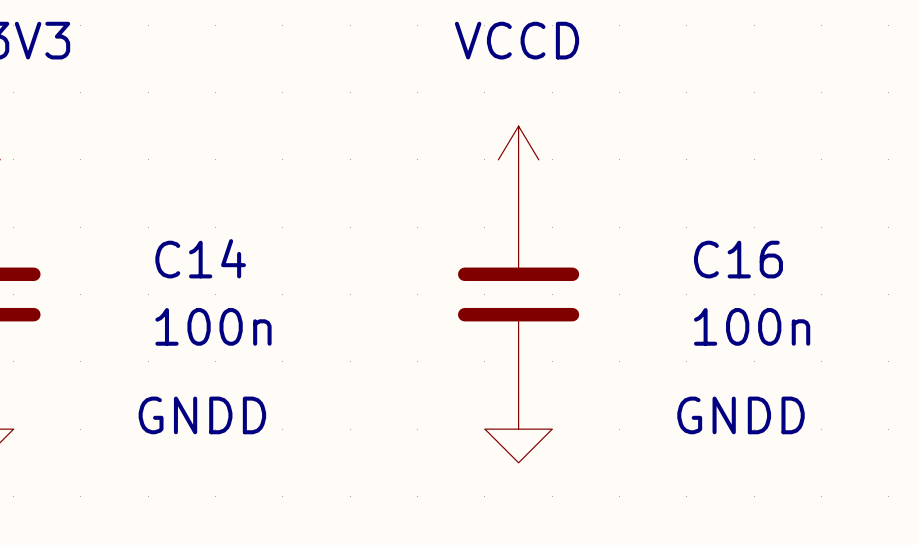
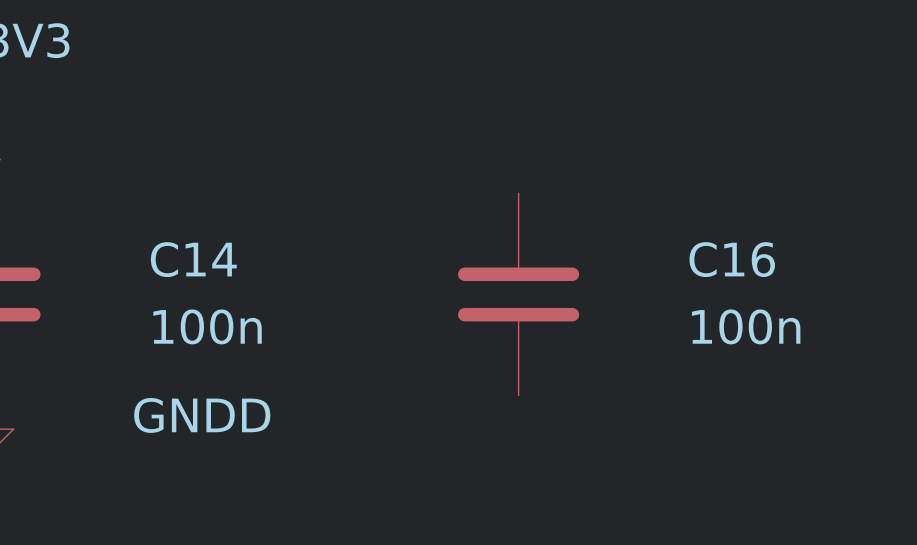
power symbol: VCCD (518, 159) -> none
power symbol: GNDD (518, 429) -> none

